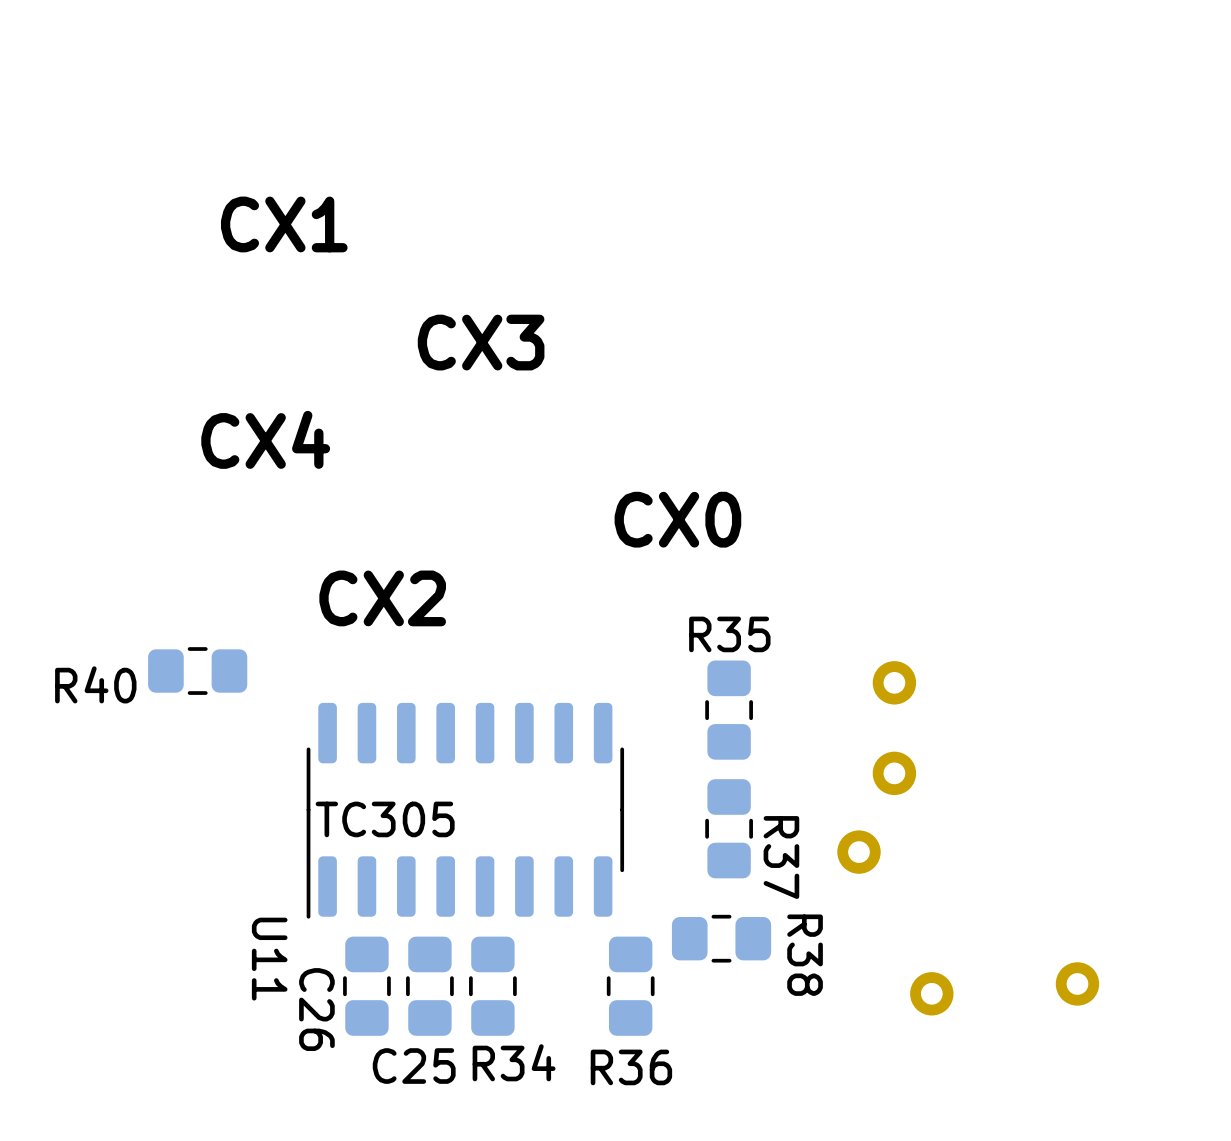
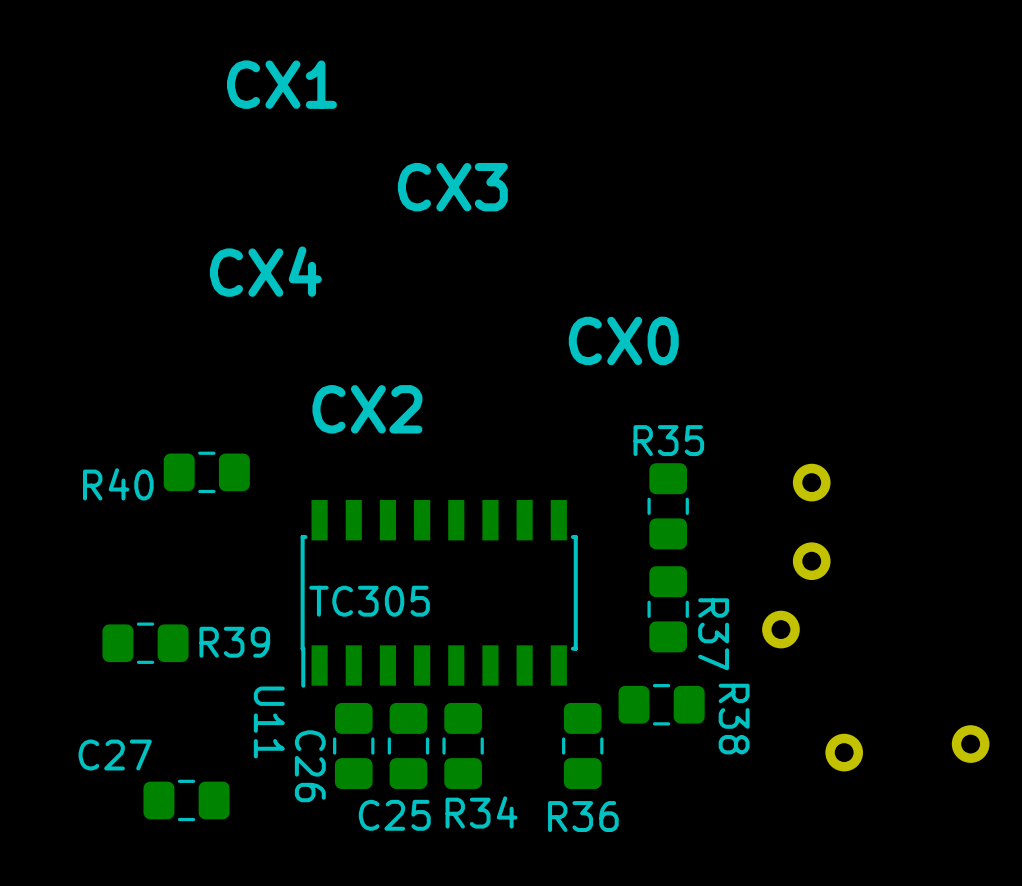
U11 footprint: [306, 702, 625, 919] -> [300, 500, 578, 688]
R39: none -> (145, 643)
C27: none -> (186, 800)

